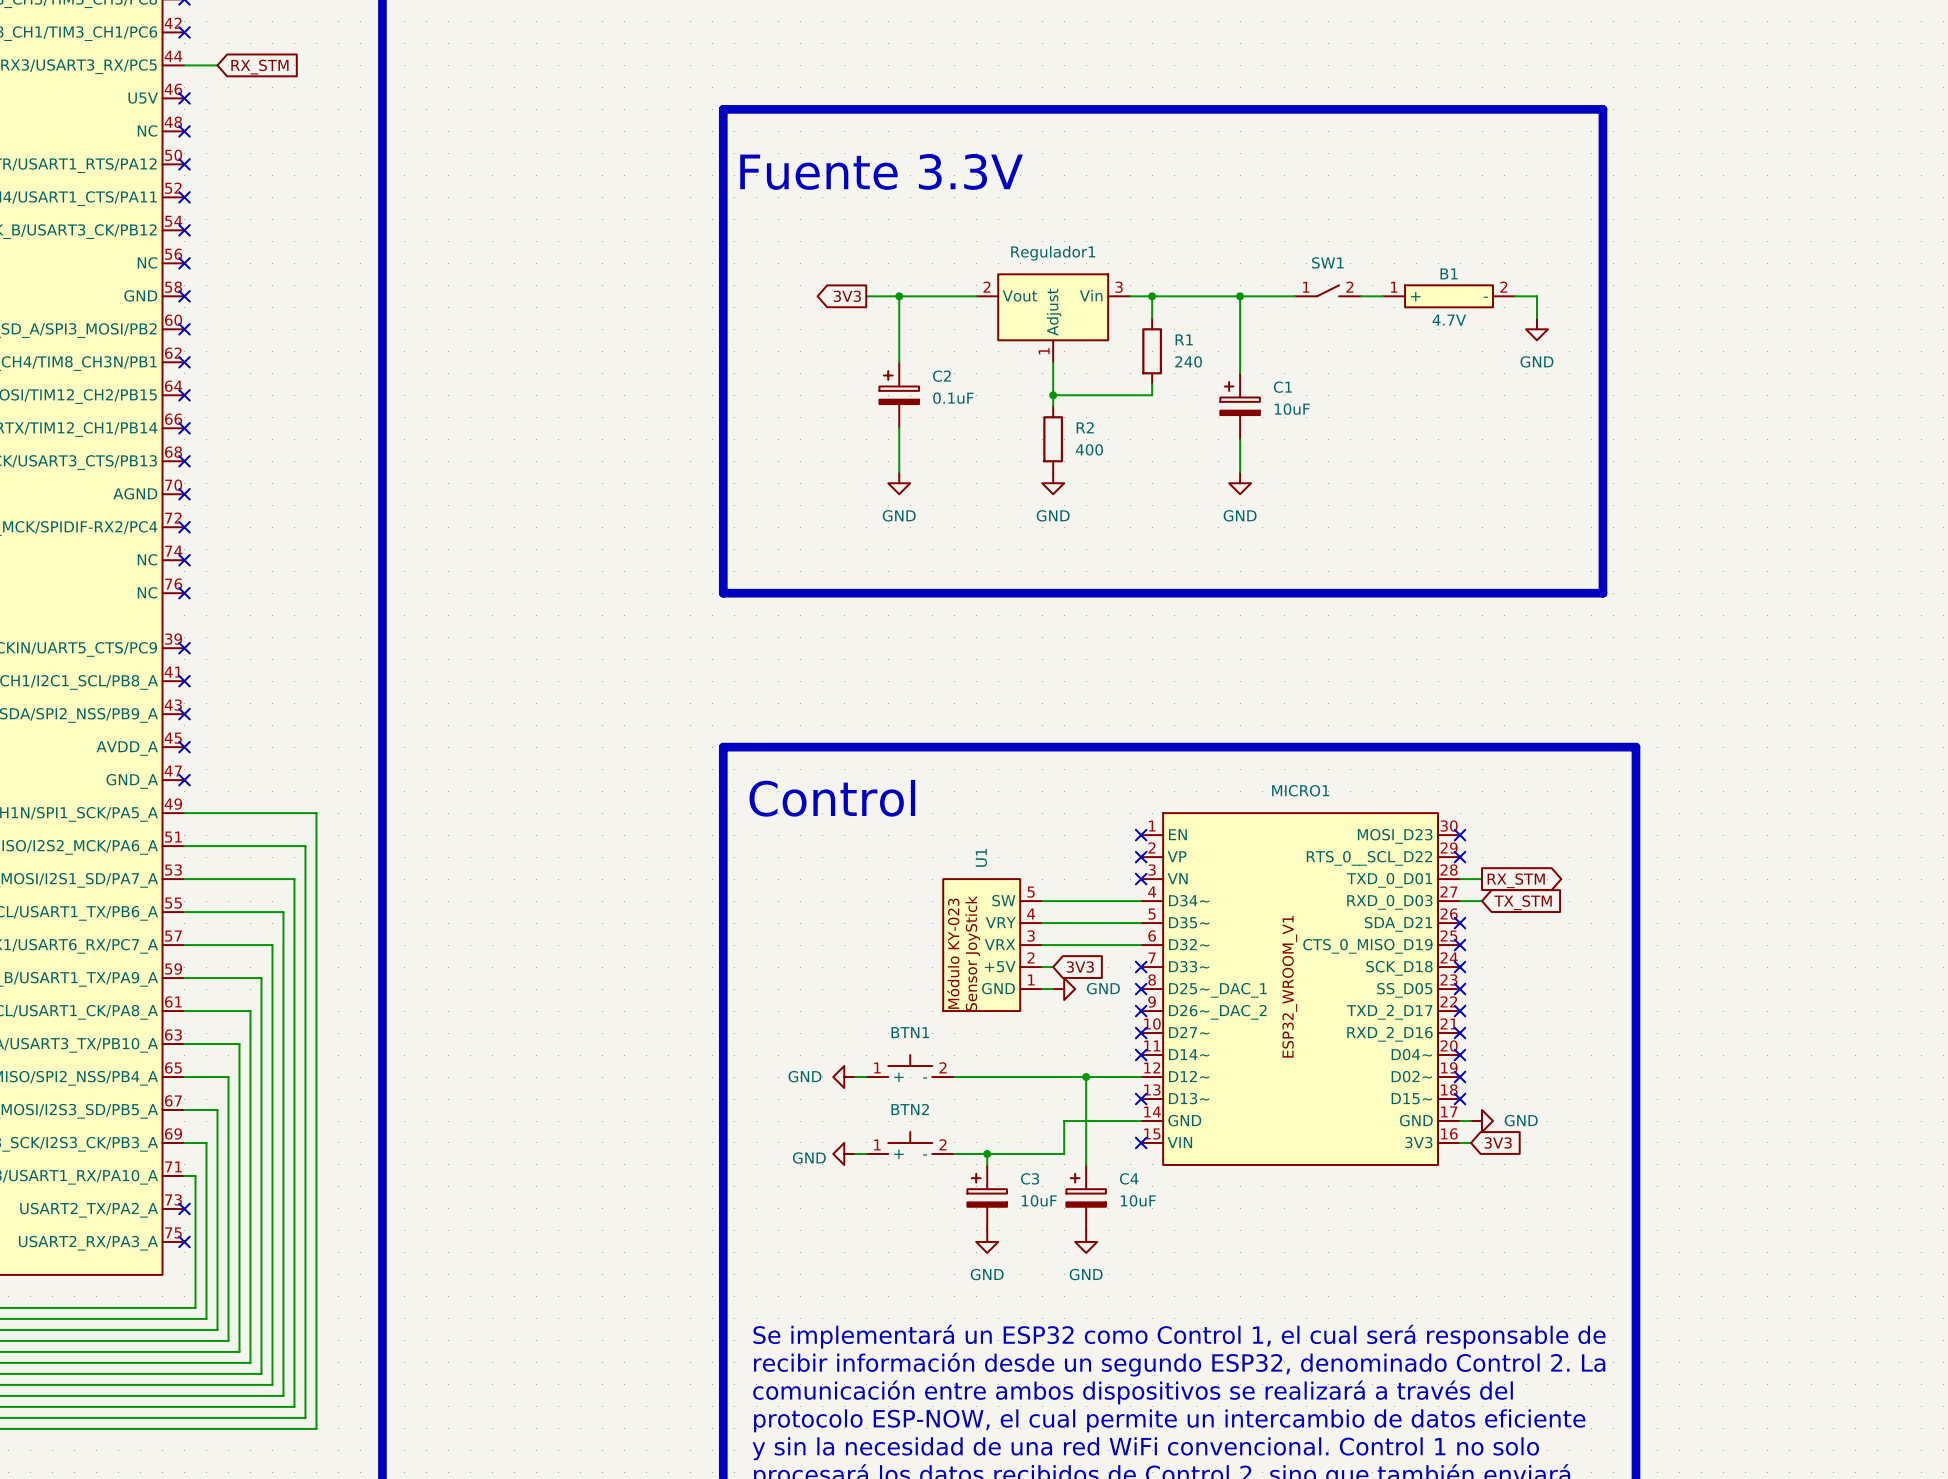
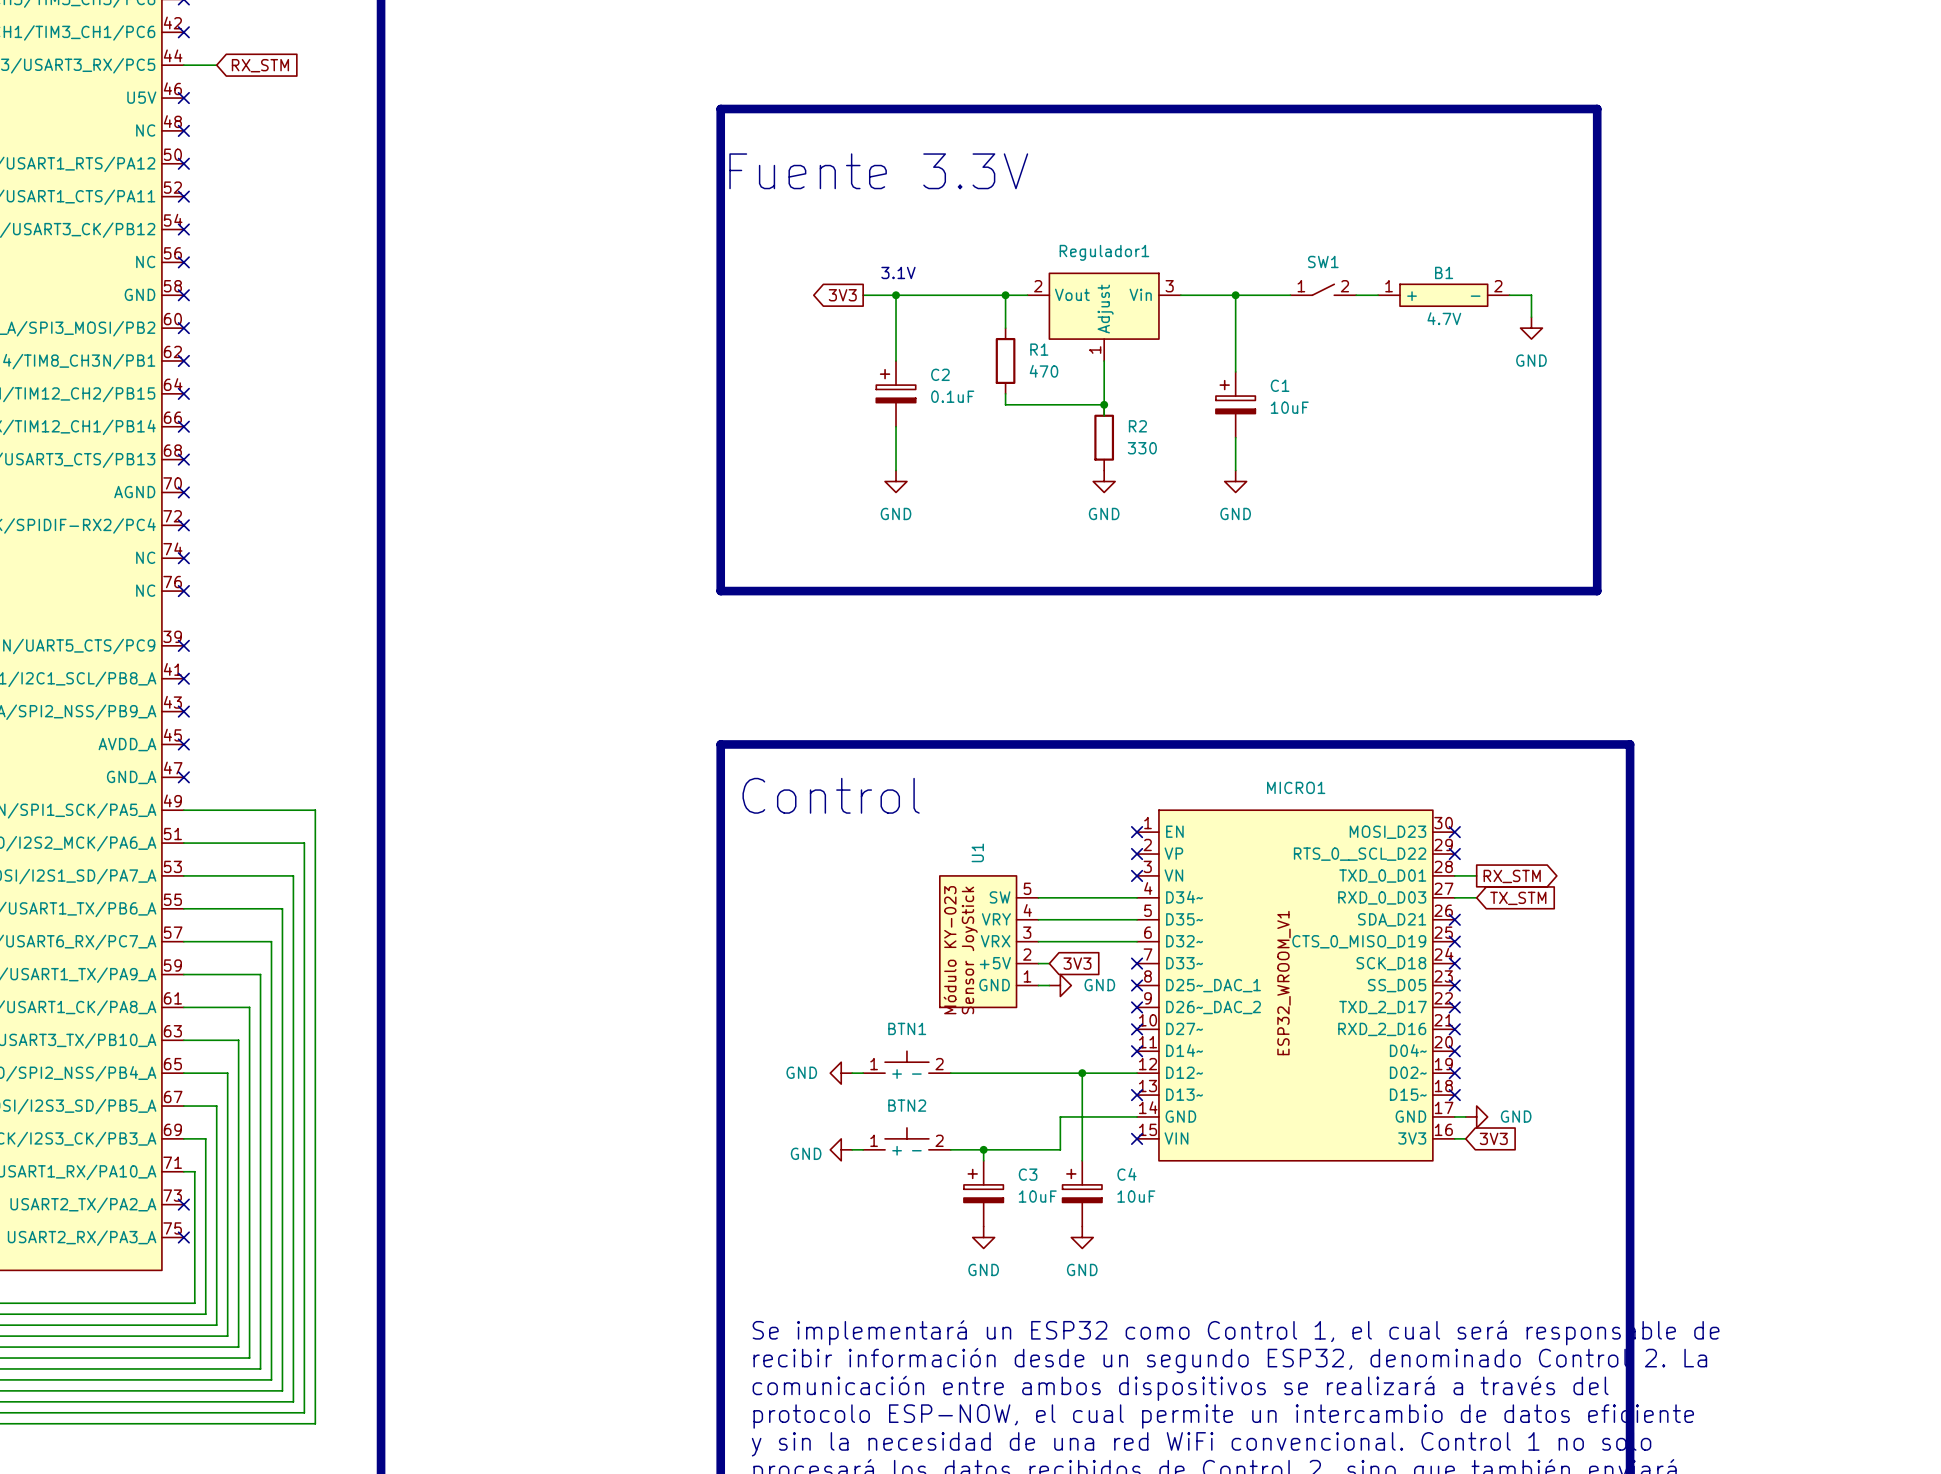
text: none -> 3.1V (898, 272)
junction: none -> (1005, 295)
junction: (1152, 296) -> none
Regulador1 position: (1053, 318) -> (1104, 317)
R1 position: (1152, 351) -> (1005, 360)
R1 value: 240 (1188, 361) -> 470 (1044, 371)
wire: (1053, 362) (1053, 406) -> none
wire: none -> (1104, 360) (1104, 415)
wire: (1152, 384) (1152, 395) (1053, 395) -> none
wire: none -> (1005, 393) (1005, 404) (1104, 404)
junction: (1053, 395) -> none
junction: none -> (1104, 404)
R2 position: (1053, 439) -> (1104, 437)
R2 value: 400 (1089, 449) -> 330 (1142, 448)
power symbol position: GND (1053, 483) -> GND (1104, 481)

